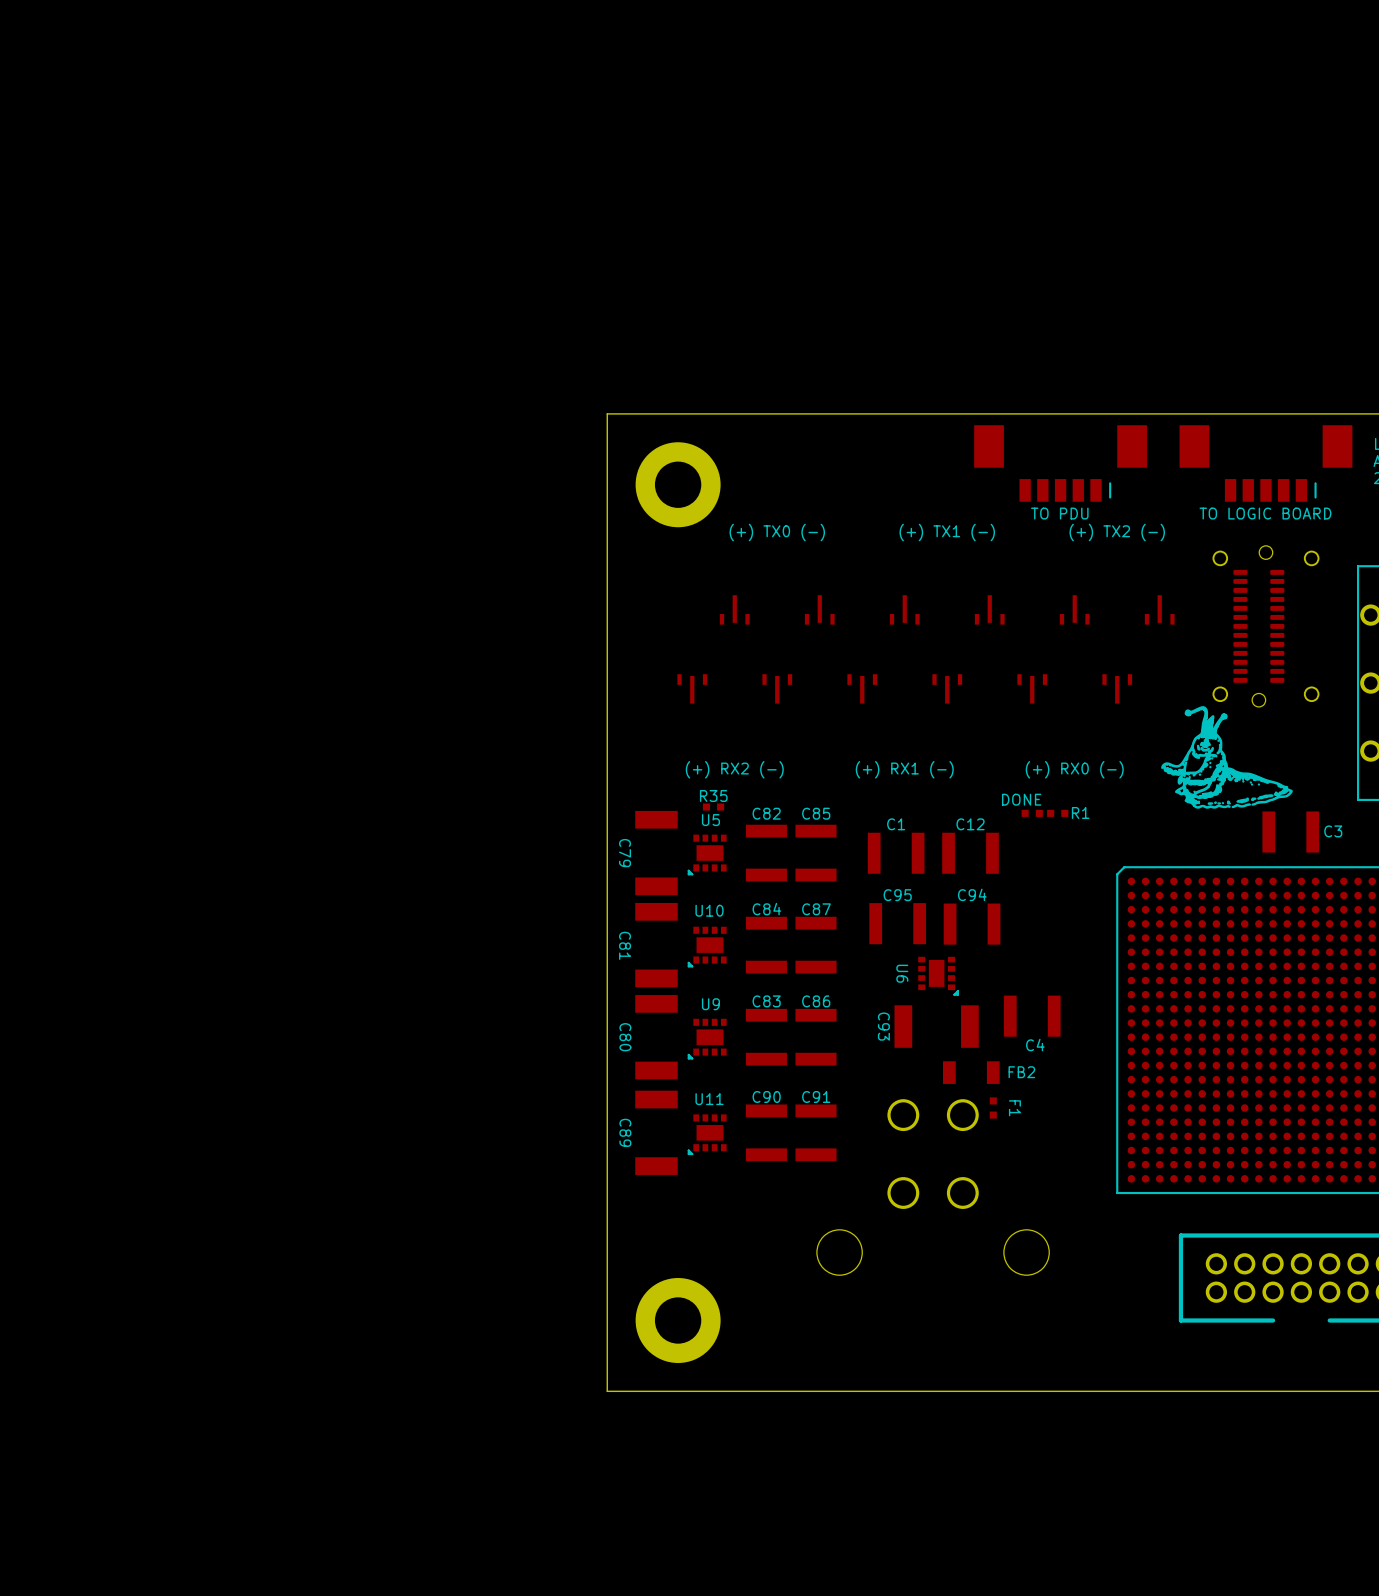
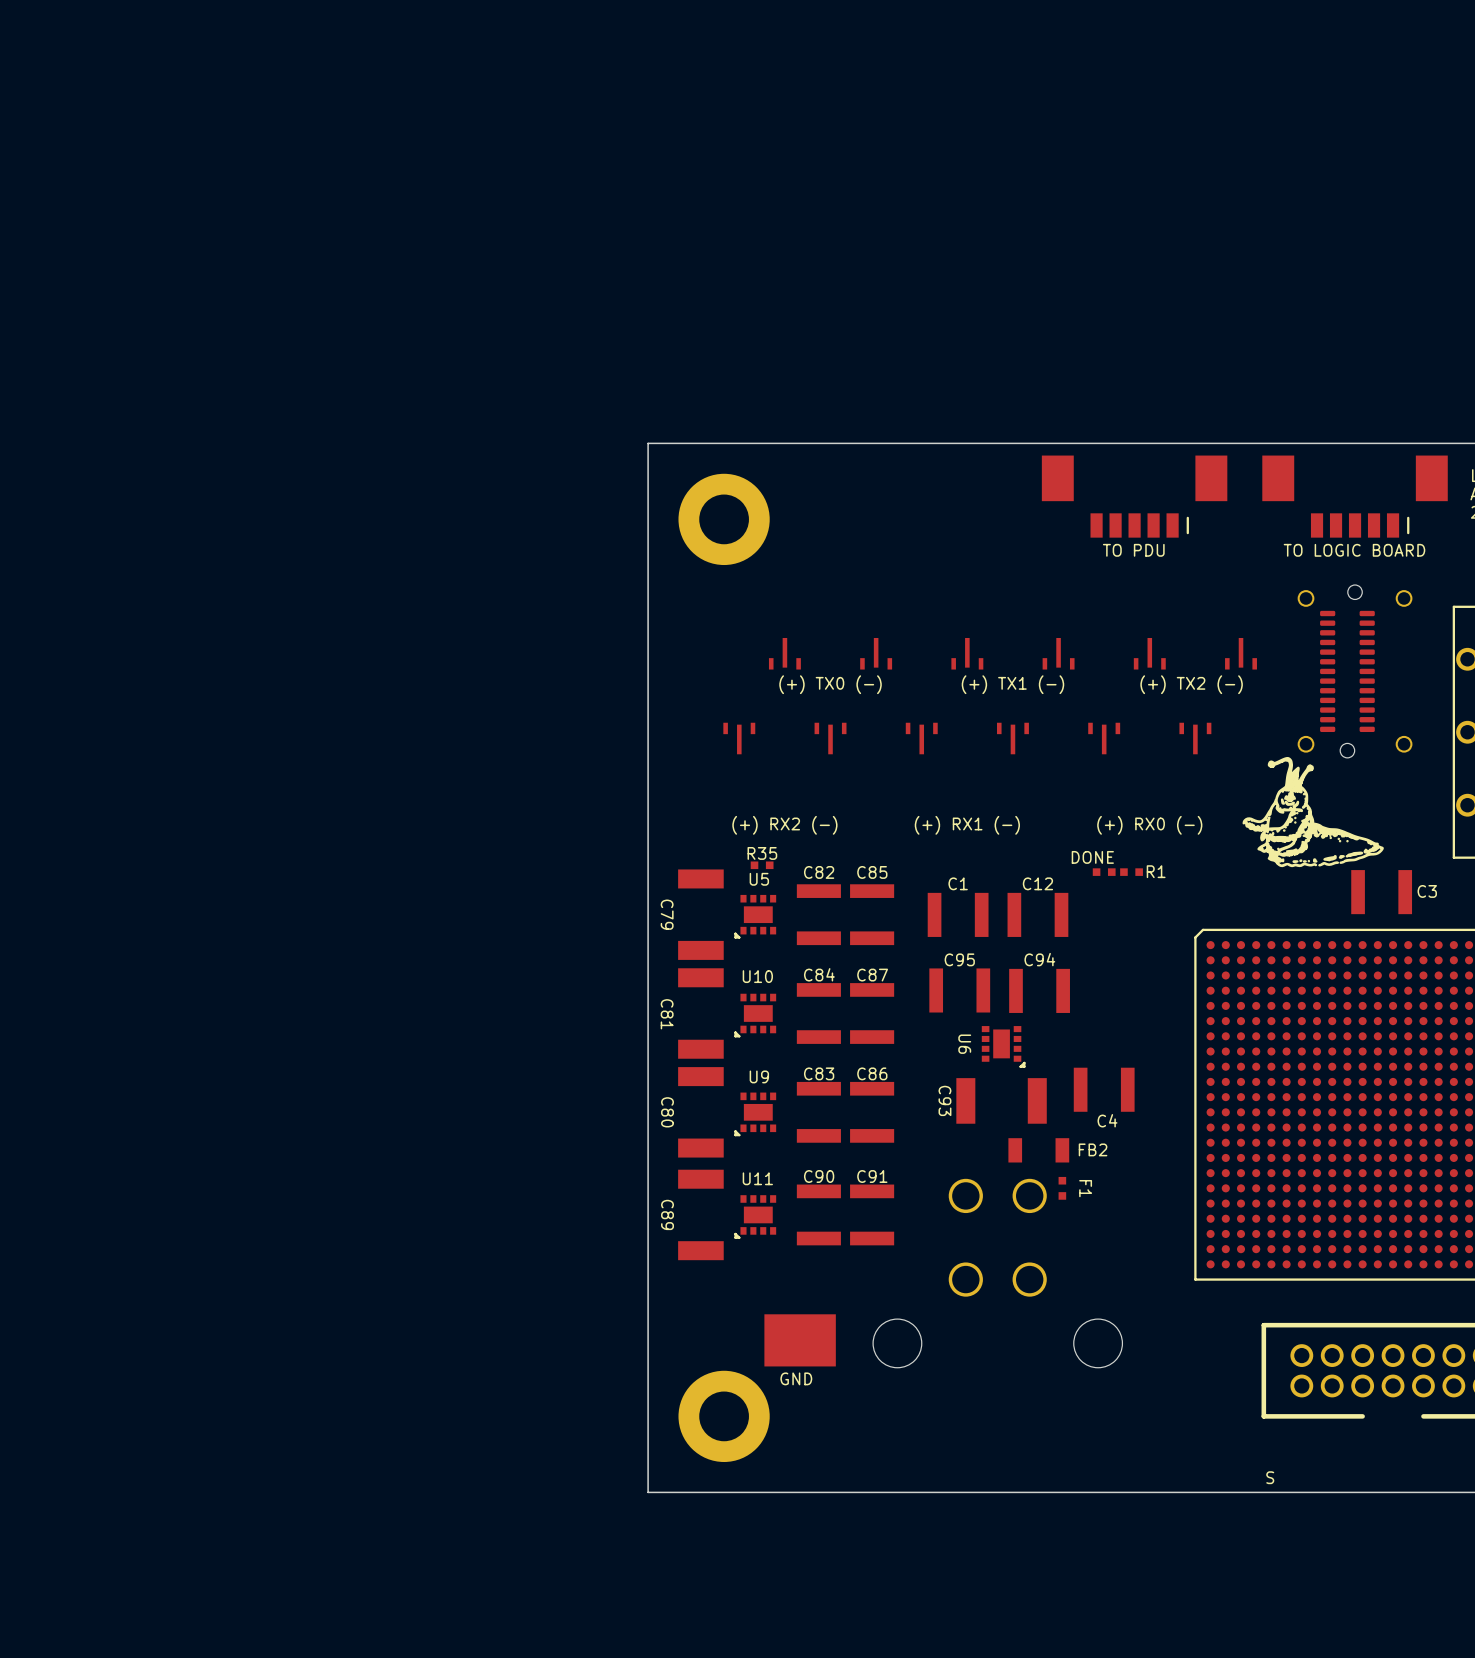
text position: (+) TX0 (-) (777, 532) -> (+) TX0 (-) (830, 684)
text position: (+) TX1 (-) (947, 532) -> (+) TX1 (-) (1012, 684)
text position: (+) TX2 (-) (1117, 532) -> (+) TX2 (-) (1191, 684)
part: none -> (800, 1340)
text: none -> GND (796, 1378)
text: none -> S (1270, 1477)

